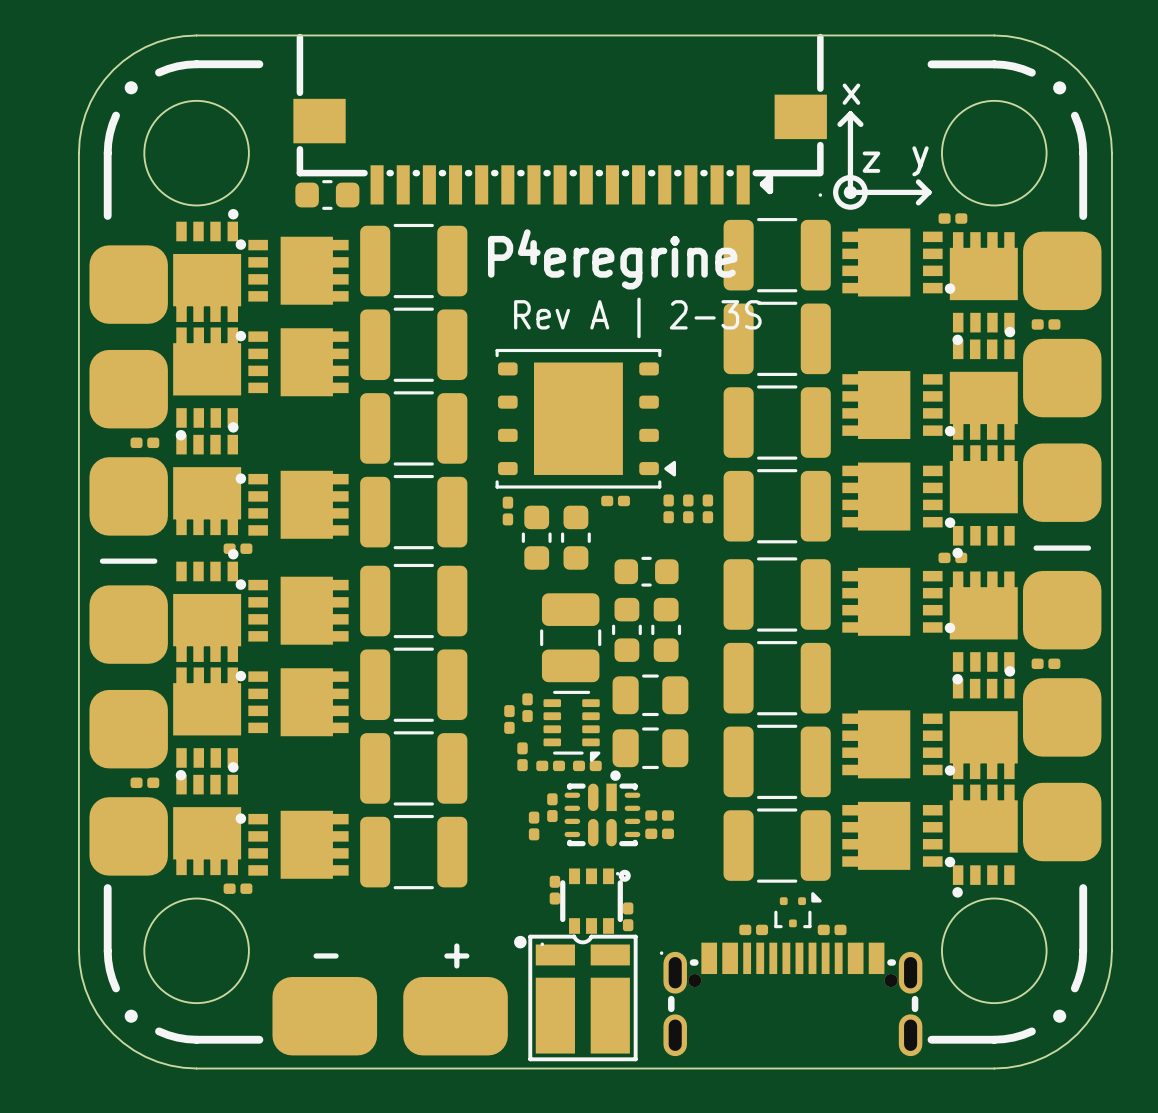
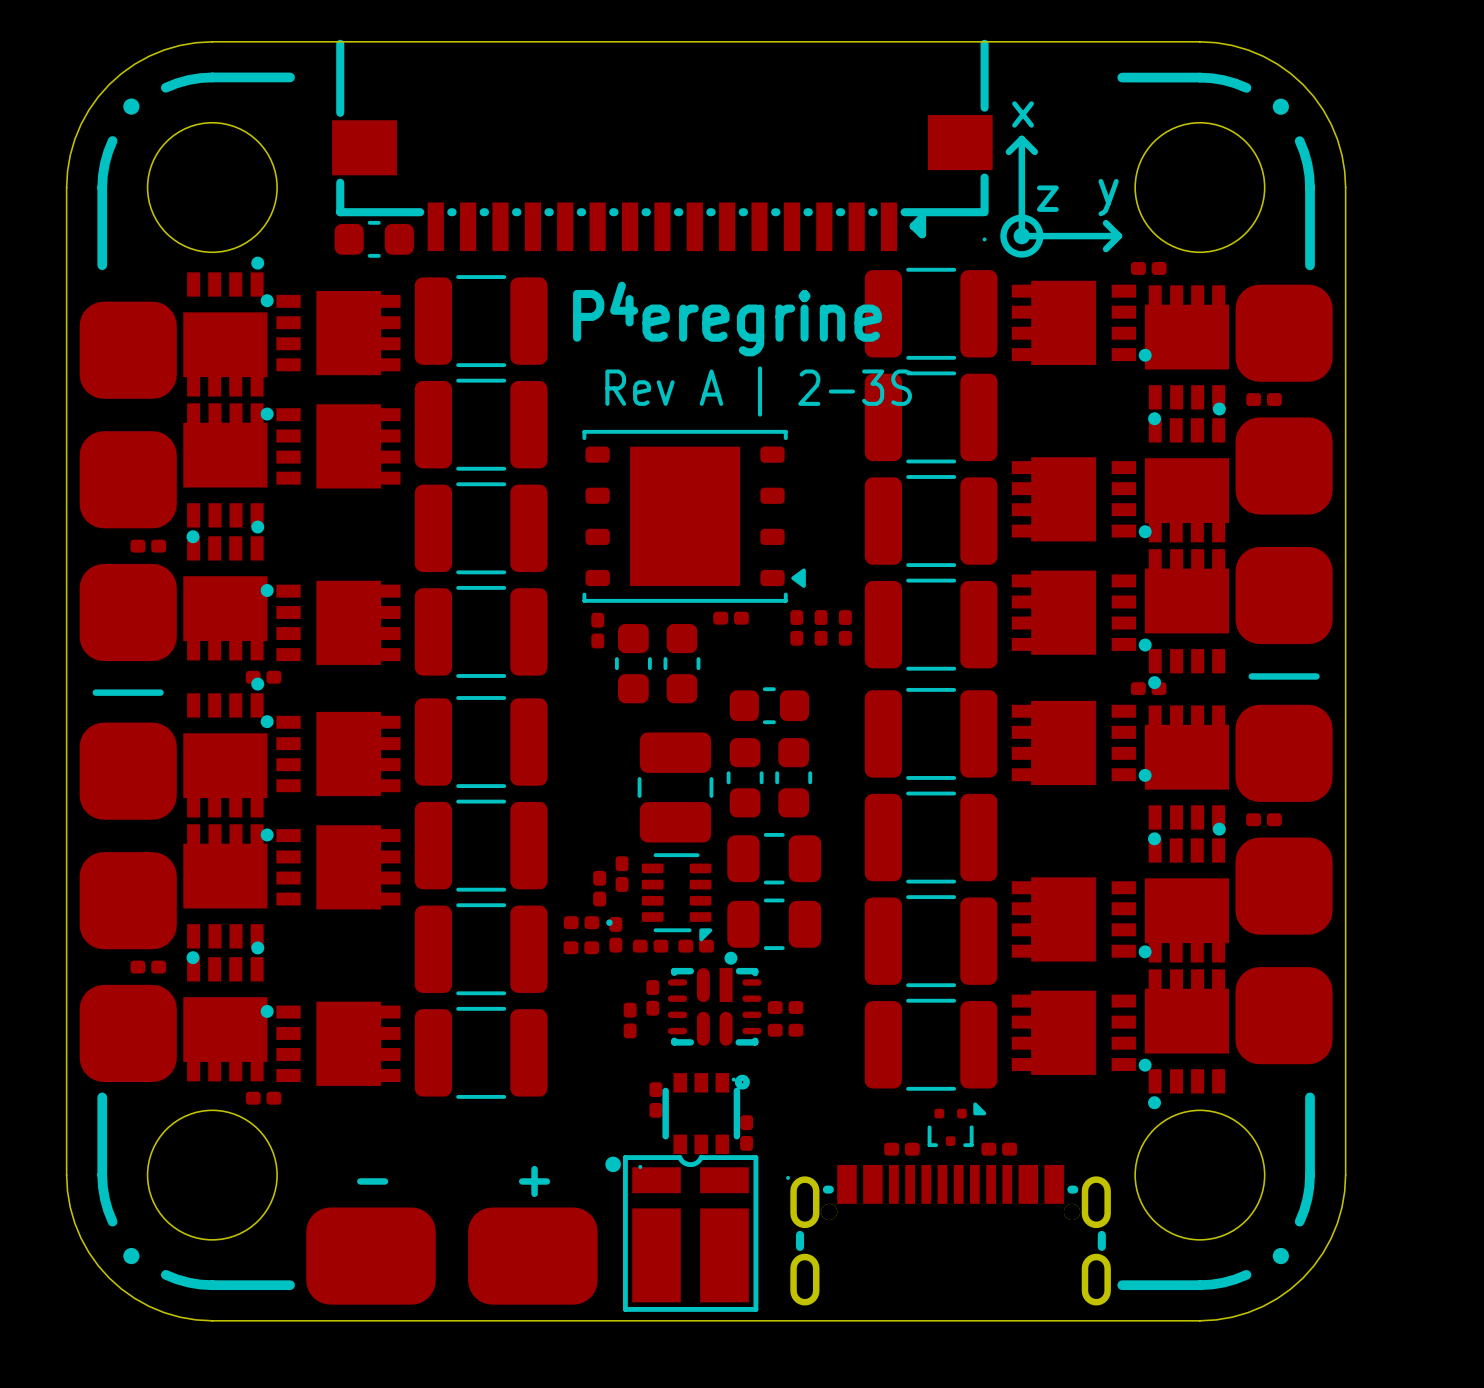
part: none -> (588, 922)
part: none -> (581, 947)

